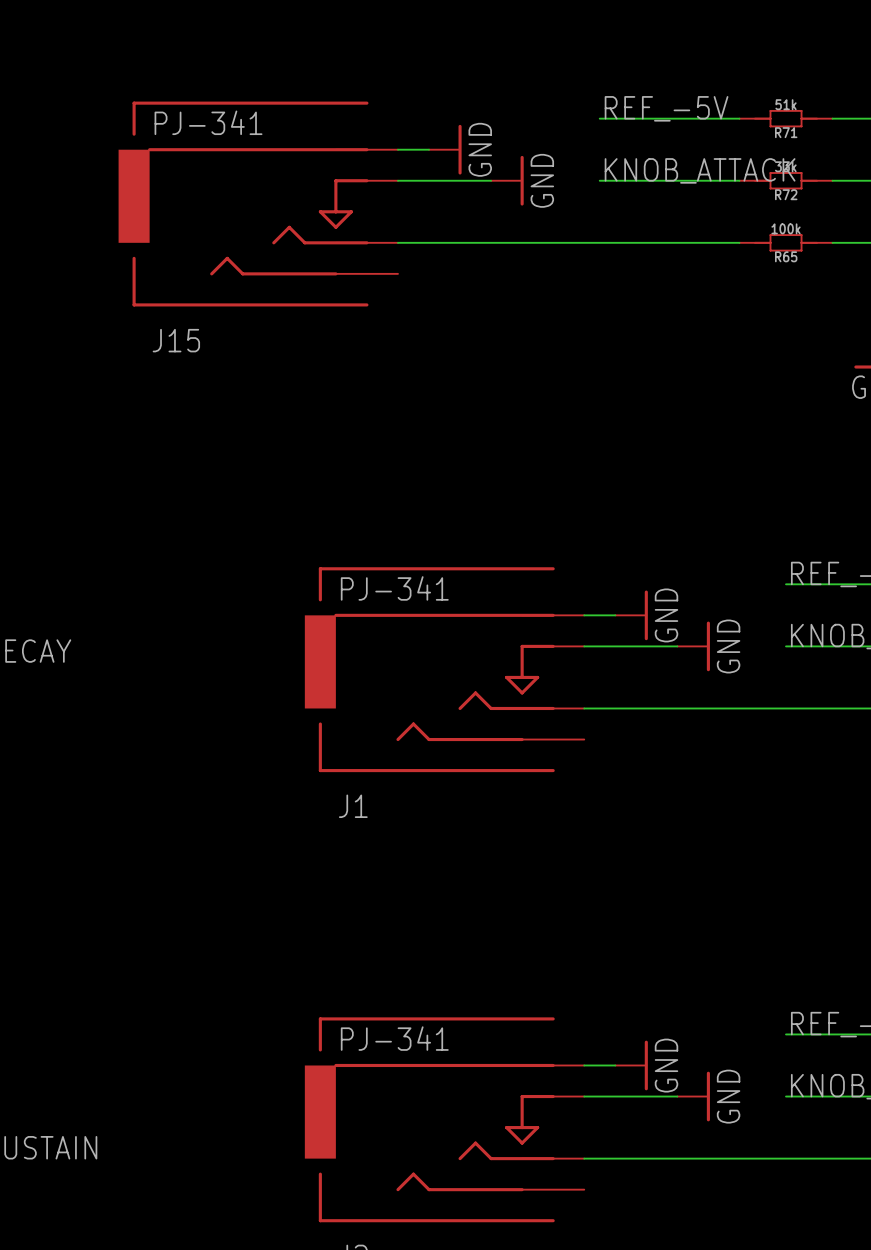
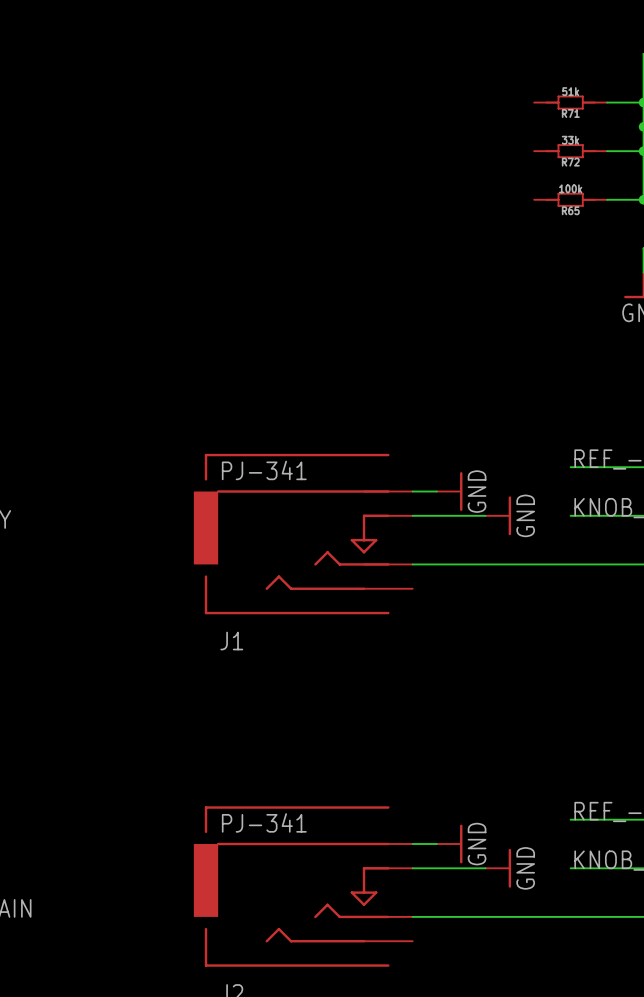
label: REF_-5V (666, 108) -> none
wire: (599, 118) (739, 118) -> none
wire: (397, 149) (429, 149) -> none
power symbol: GND (445, 149) -> none
label: KNOB_ATTACK (700, 170) -> none
wire: (397, 180) (491, 180) -> none
power symbol: GND (507, 180) -> none
wire: (599, 180) (739, 180) -> none
J15: PJ-341 (258, 204) -> none
wire: (397, 242) (739, 242) -> none

